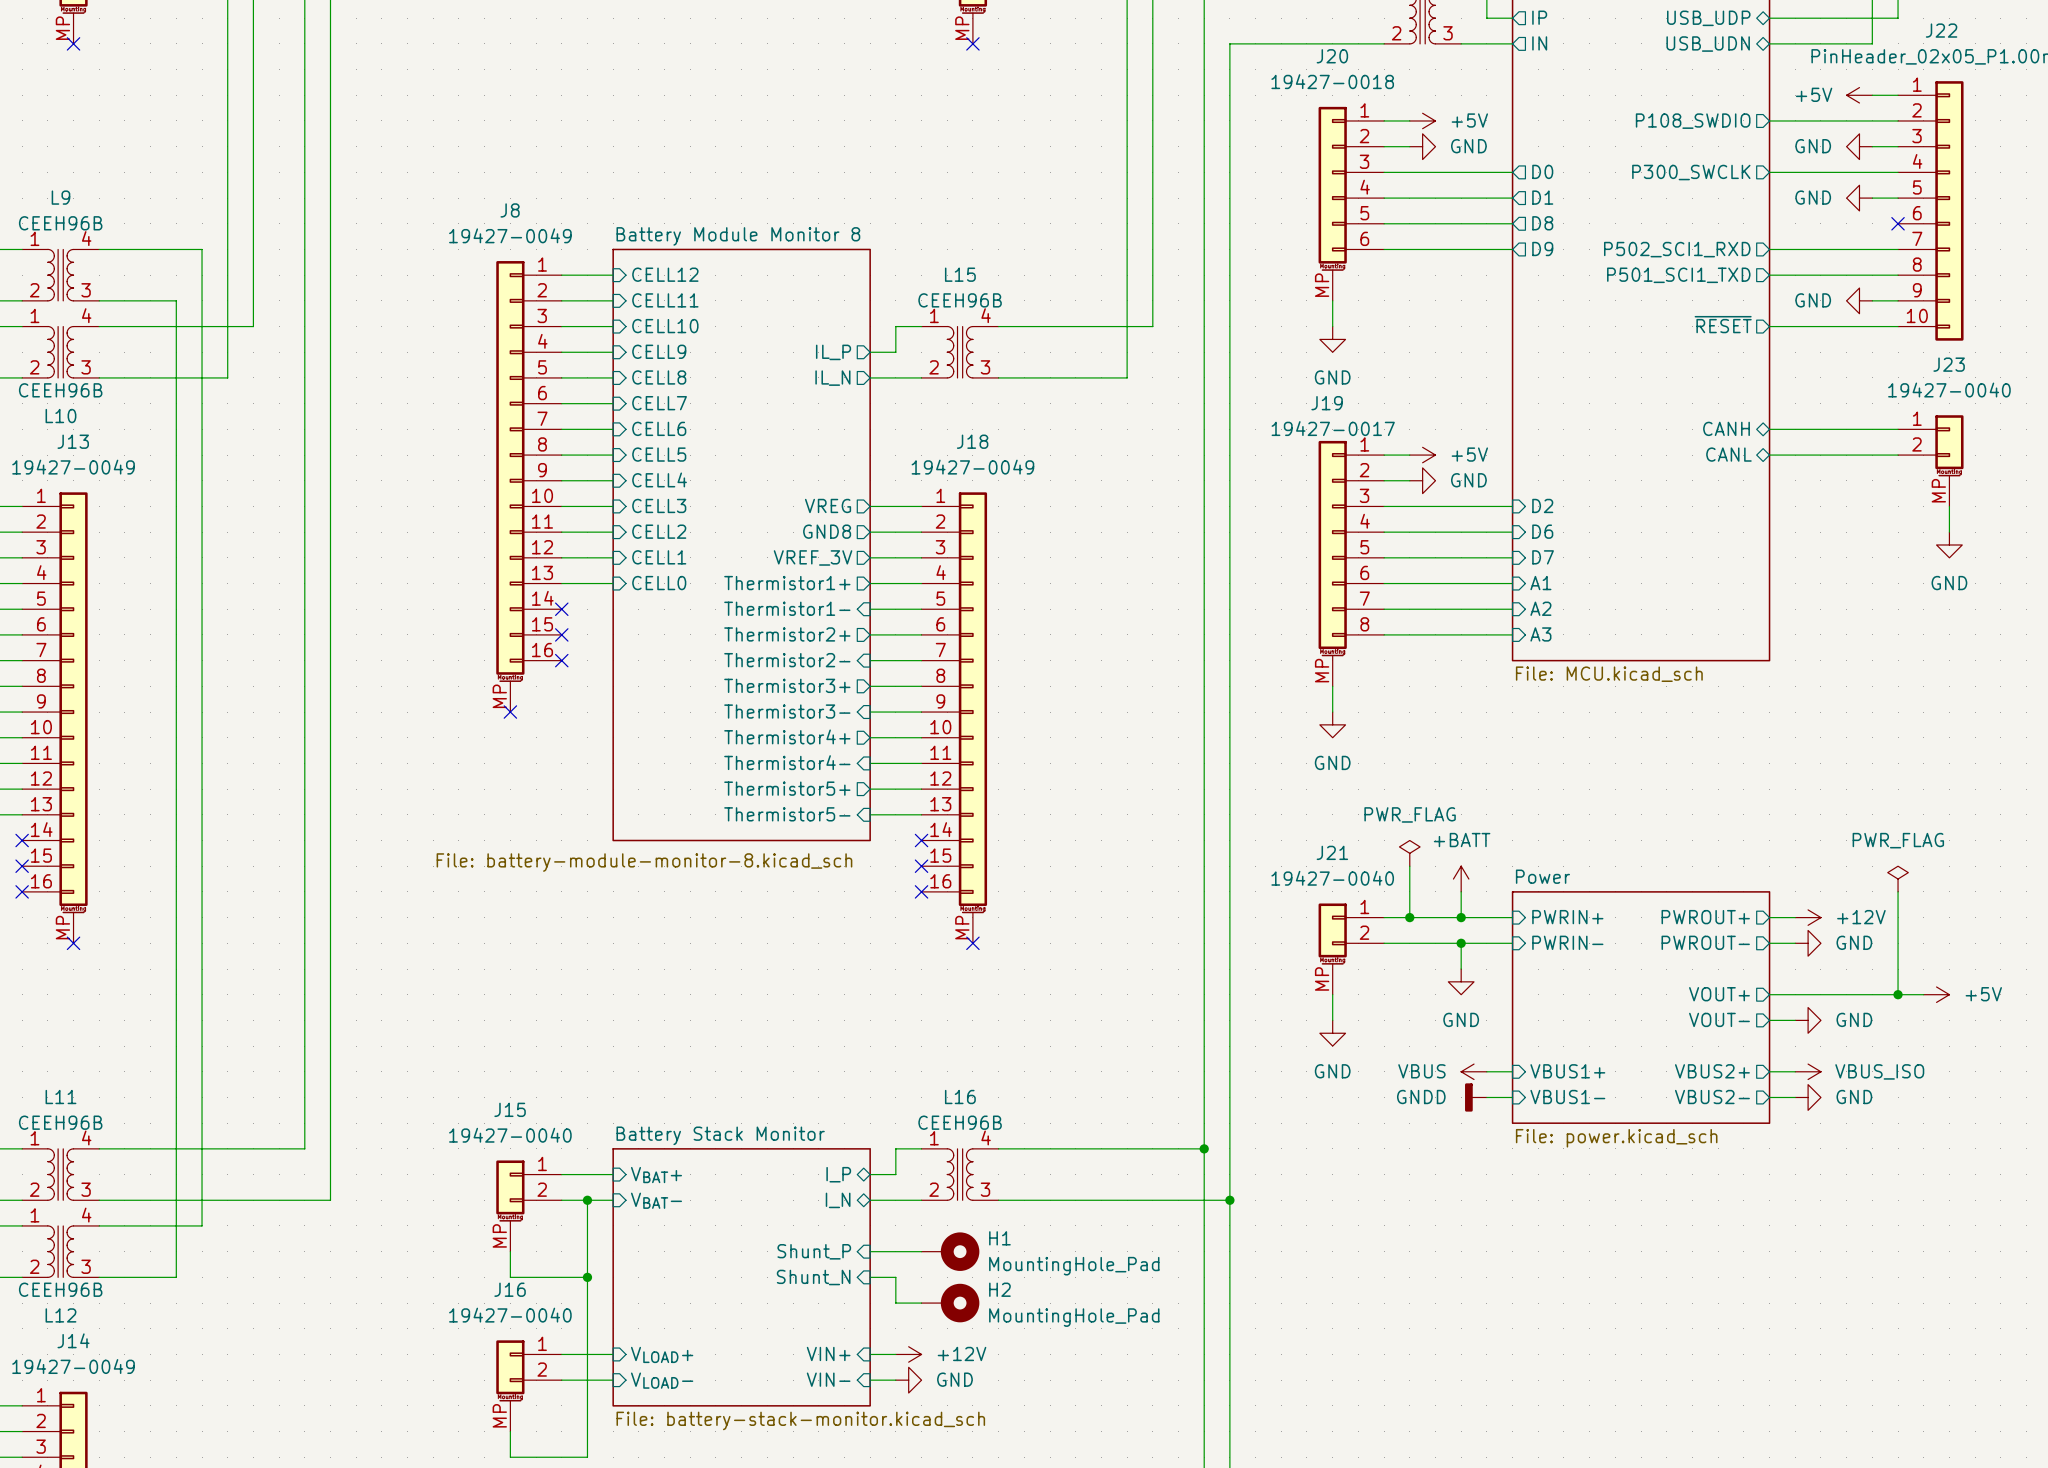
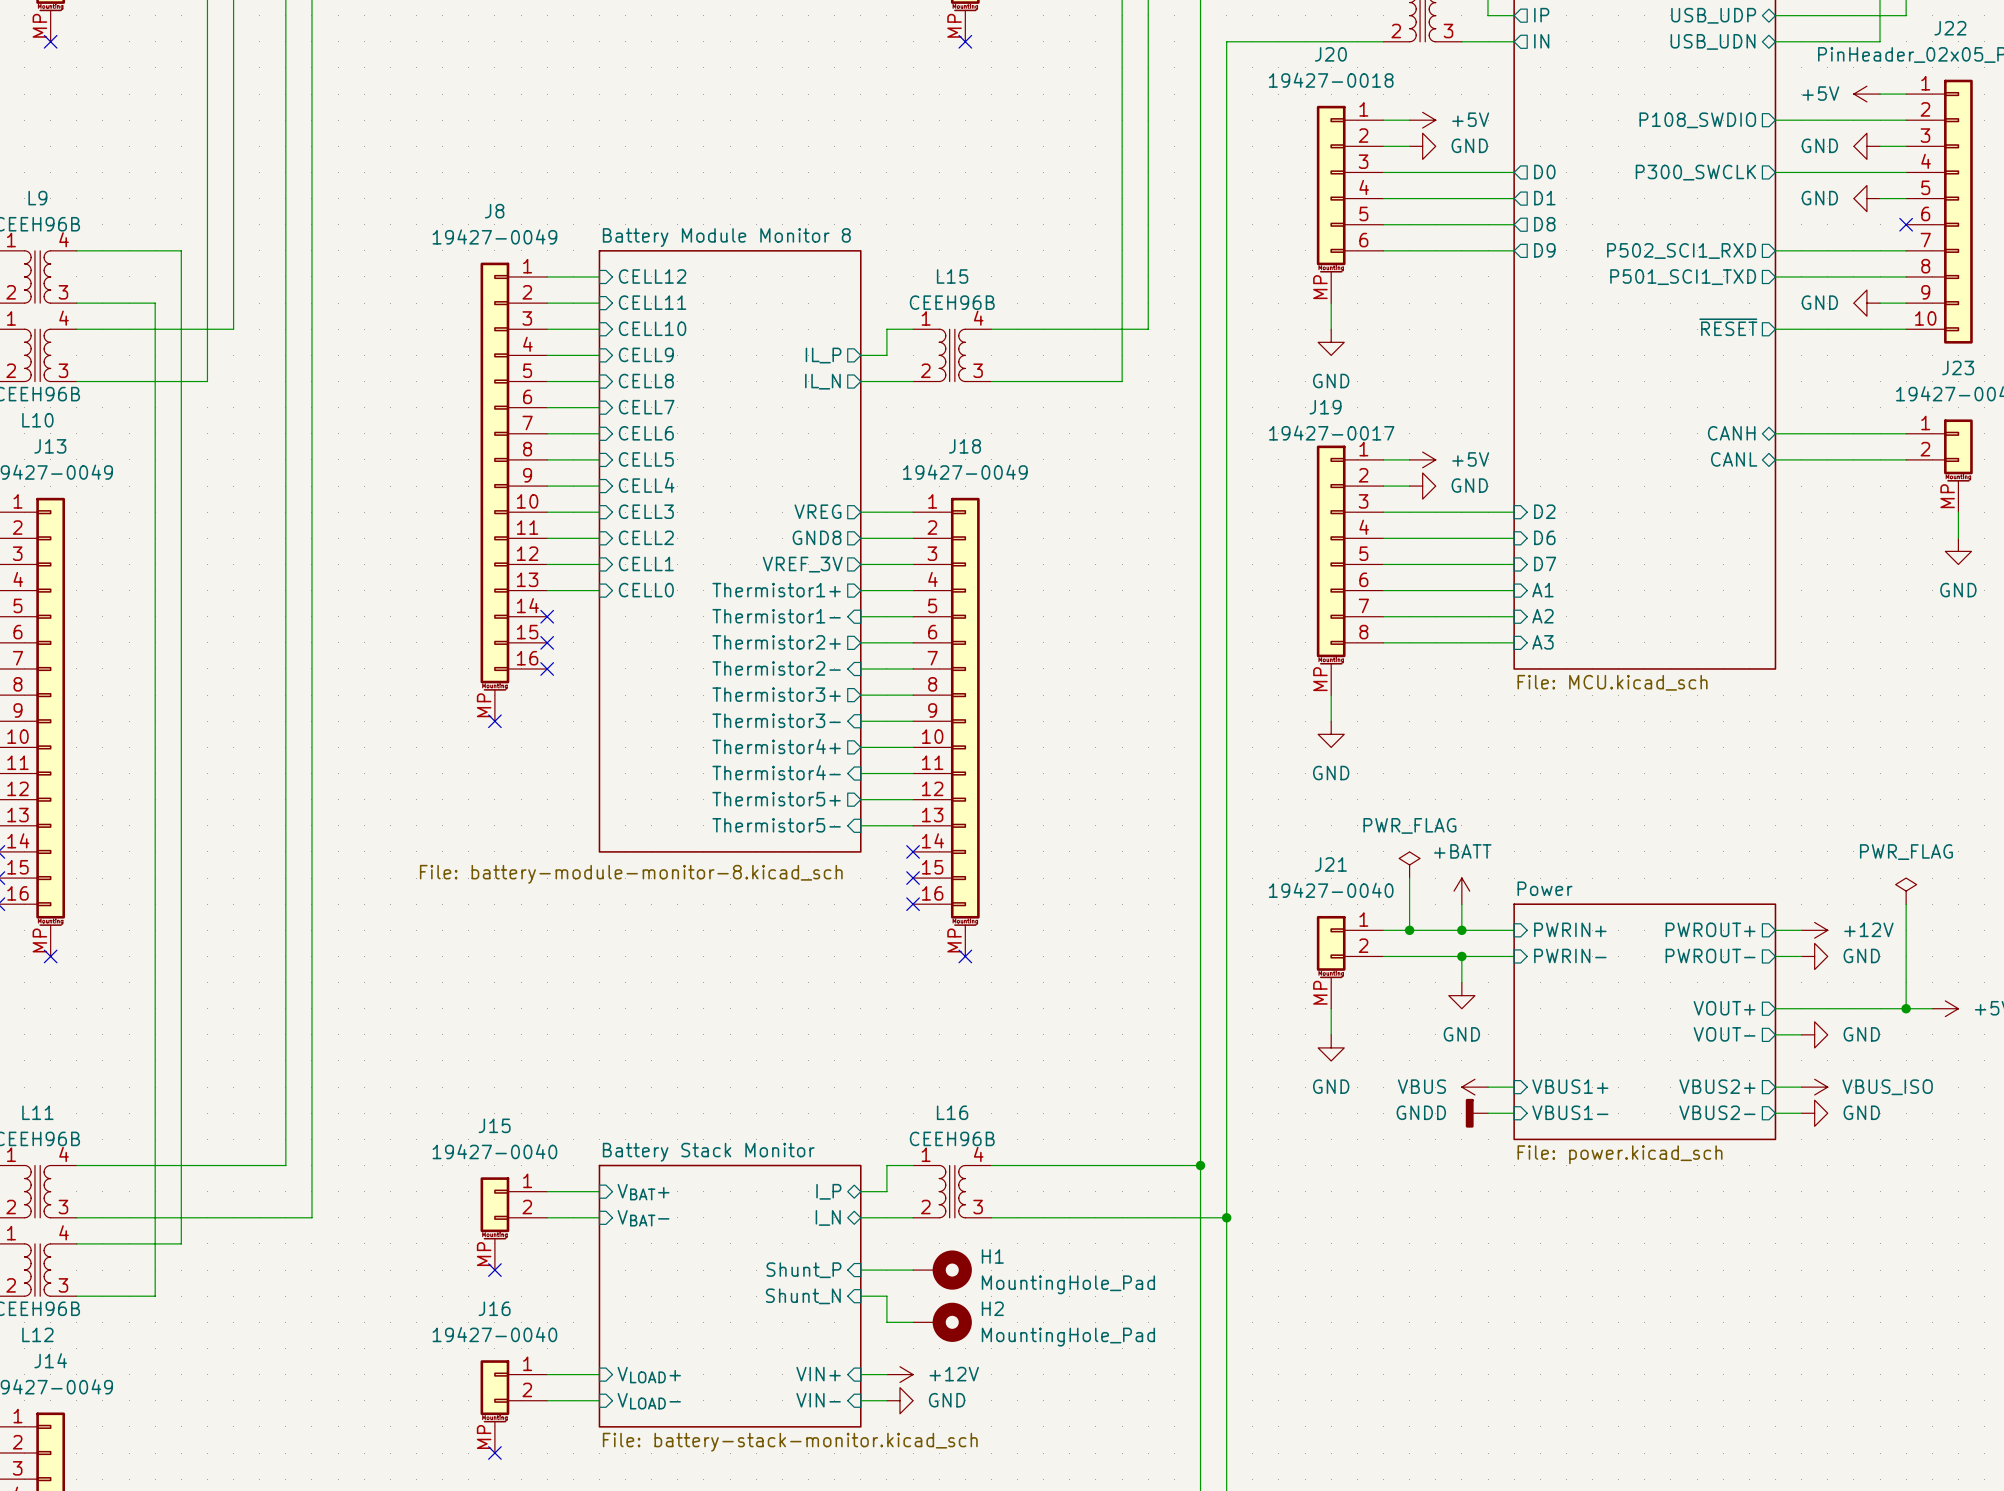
wire: (587, 1200) (587, 1457) (510, 1457) (510, 1431) -> none
junction: (587, 1200) -> none
wire: (510, 1251) (510, 1277) (587, 1277) -> none
no-connect mark: none -> (494, 1270)
junction: (587, 1277) -> none
no-connect mark: none -> (494, 1453)

